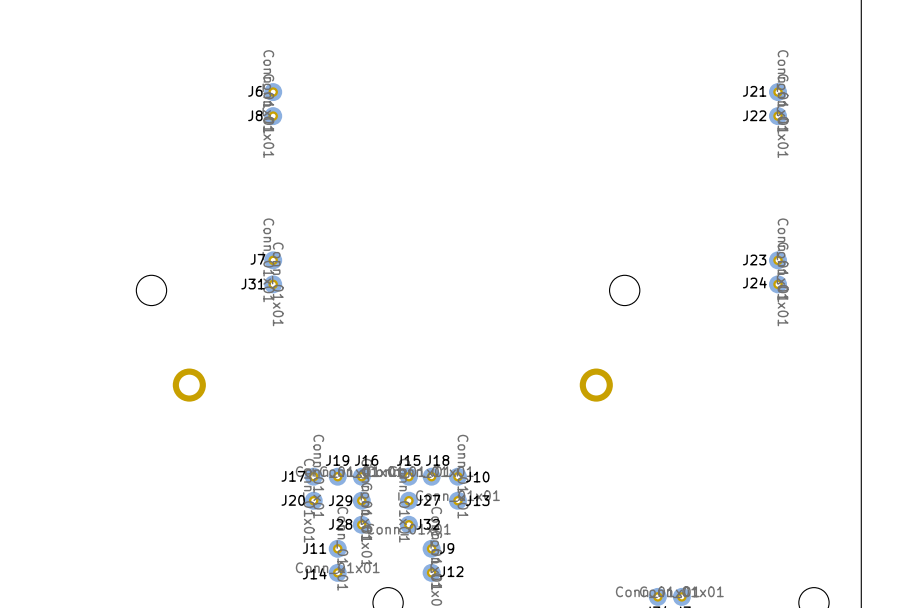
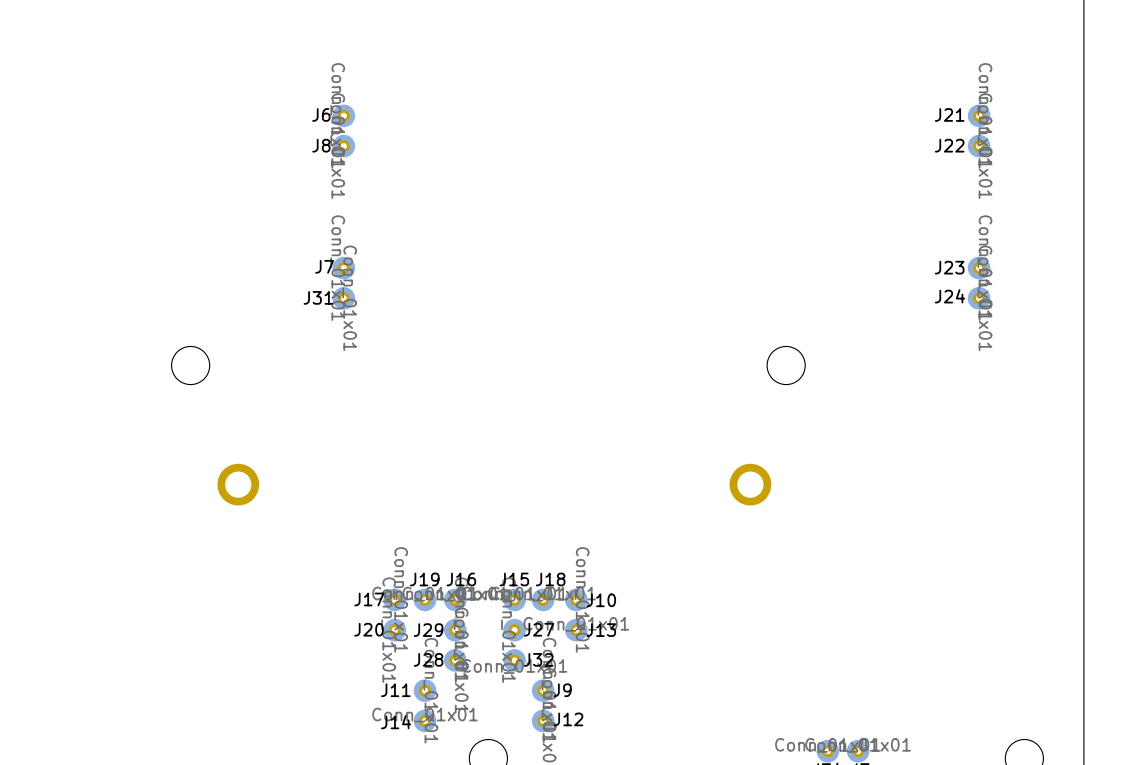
J7 position: (273, 260) -> (343, 268)
J23 position: (778, 260) -> (979, 268)
J31 position: (273, 284) -> (343, 298)
J24 position: (778, 284) -> (979, 298)

